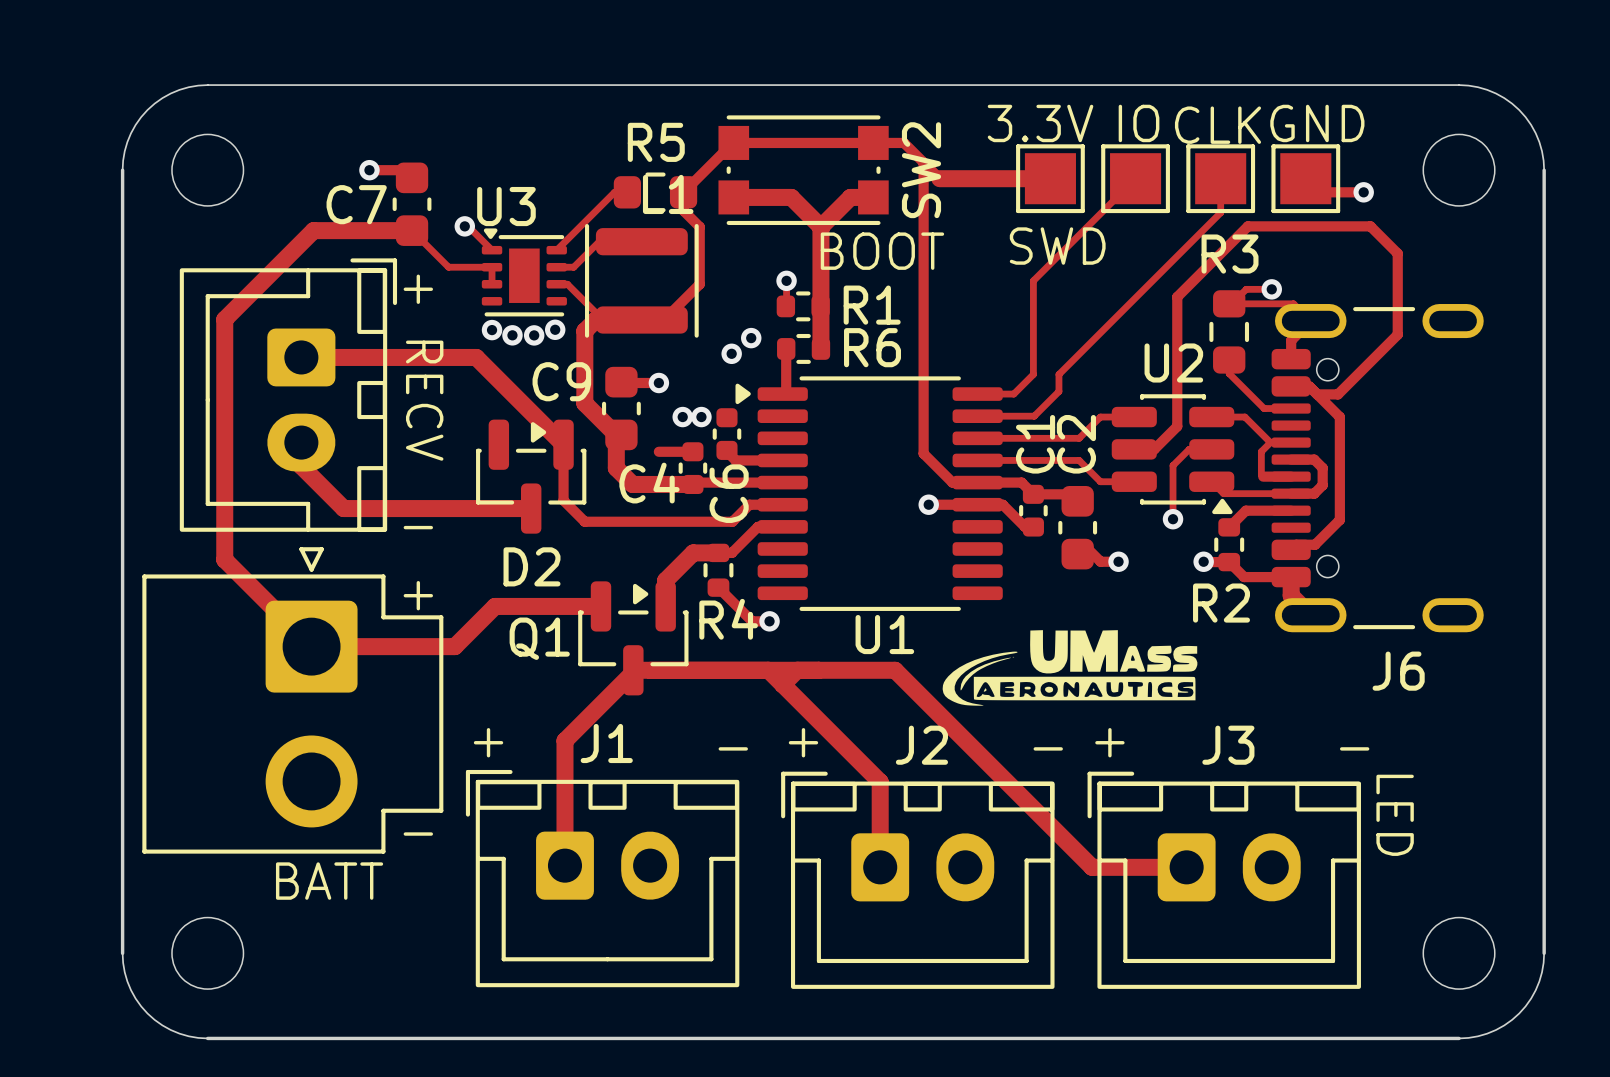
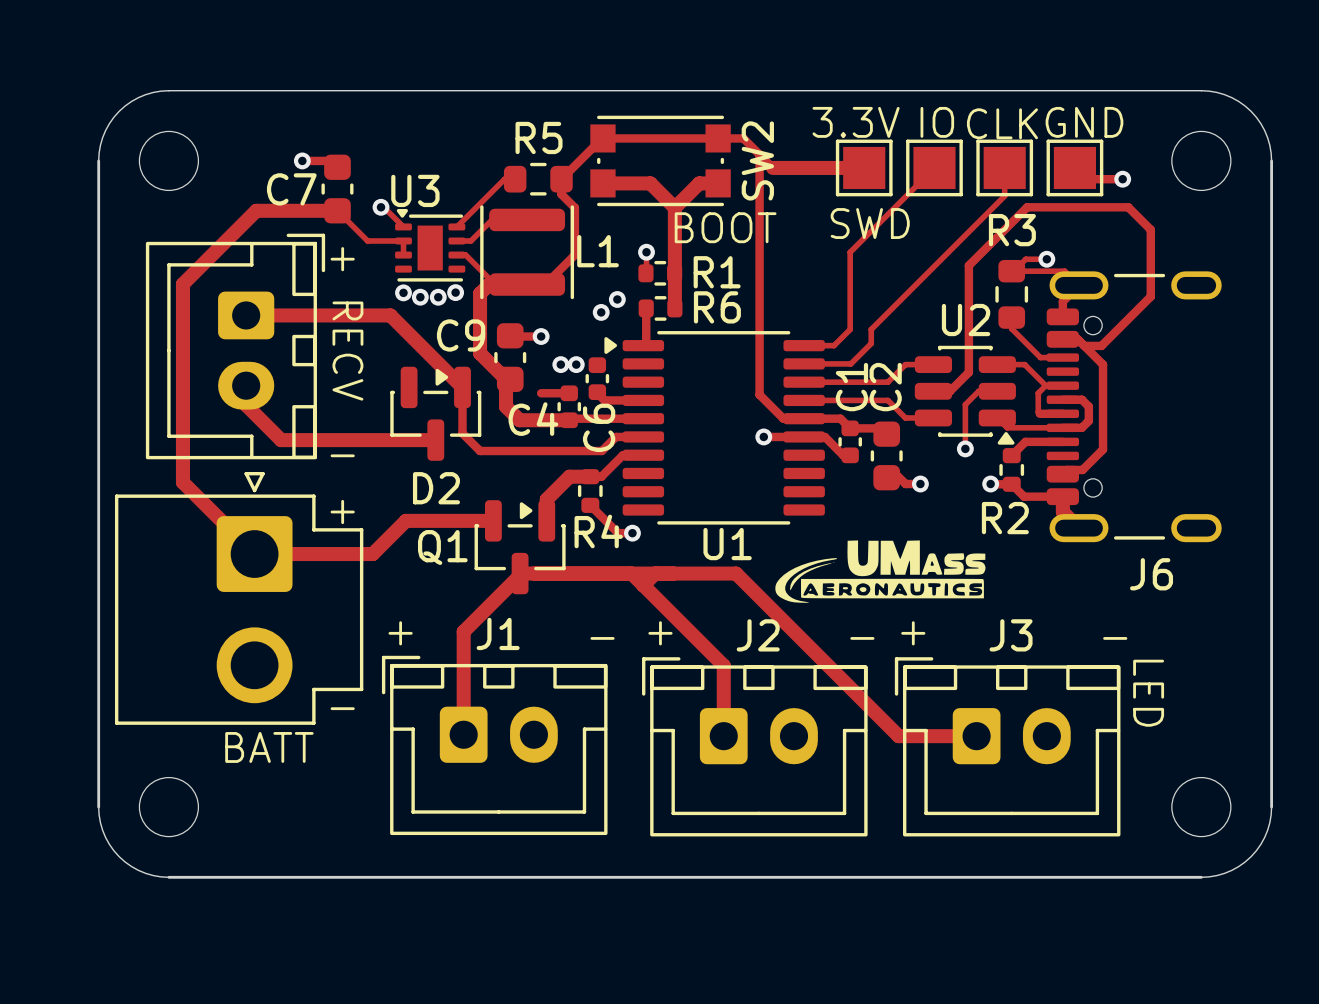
L1 name position: L1 (668, 194) -> L1 (598, 251)

